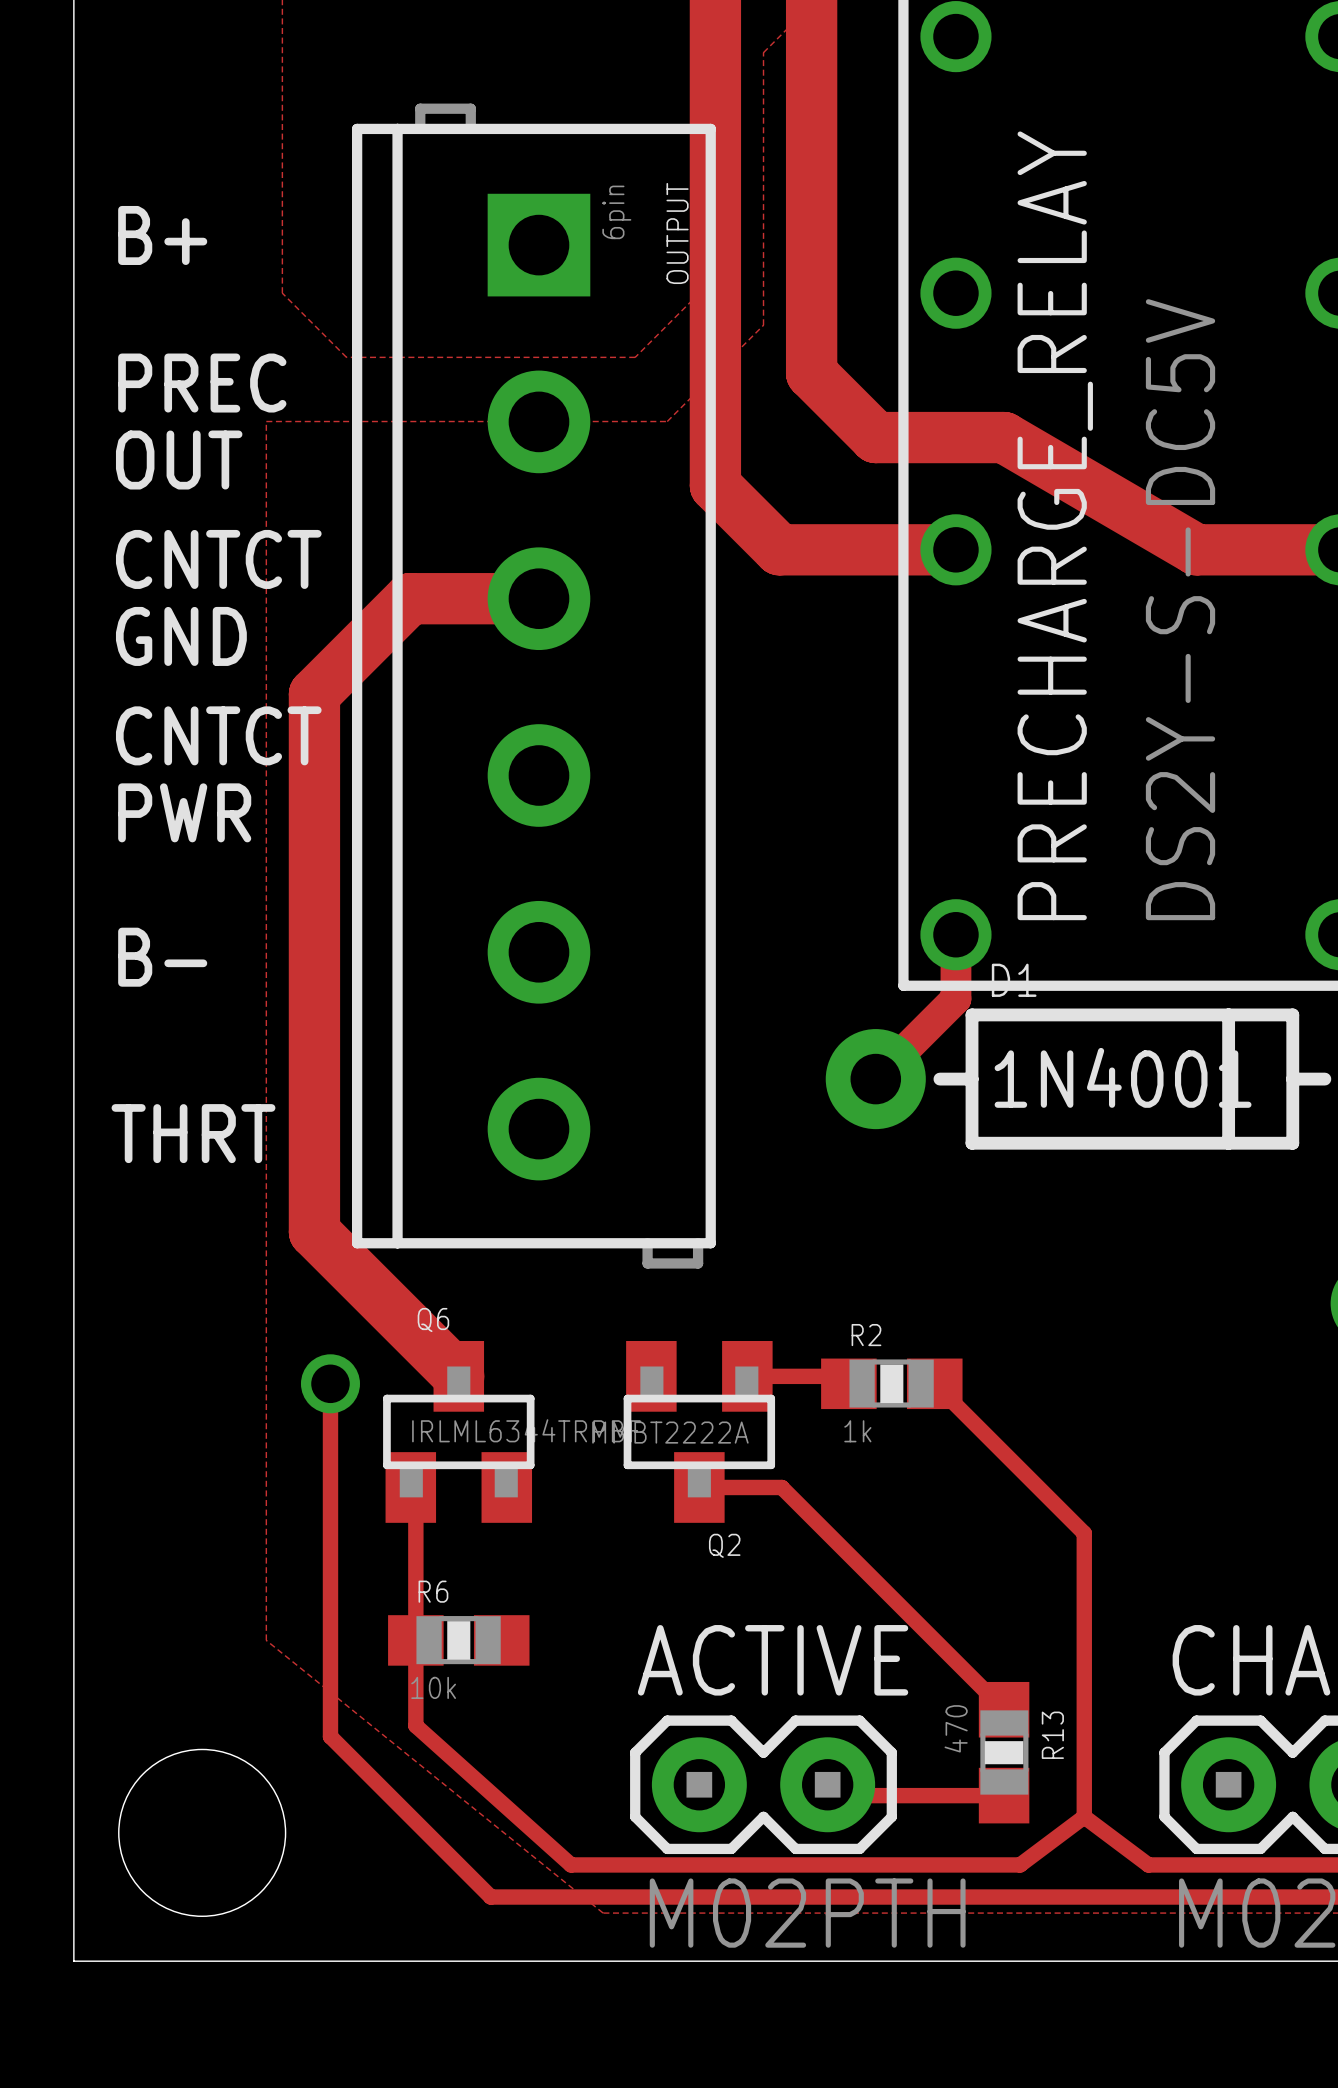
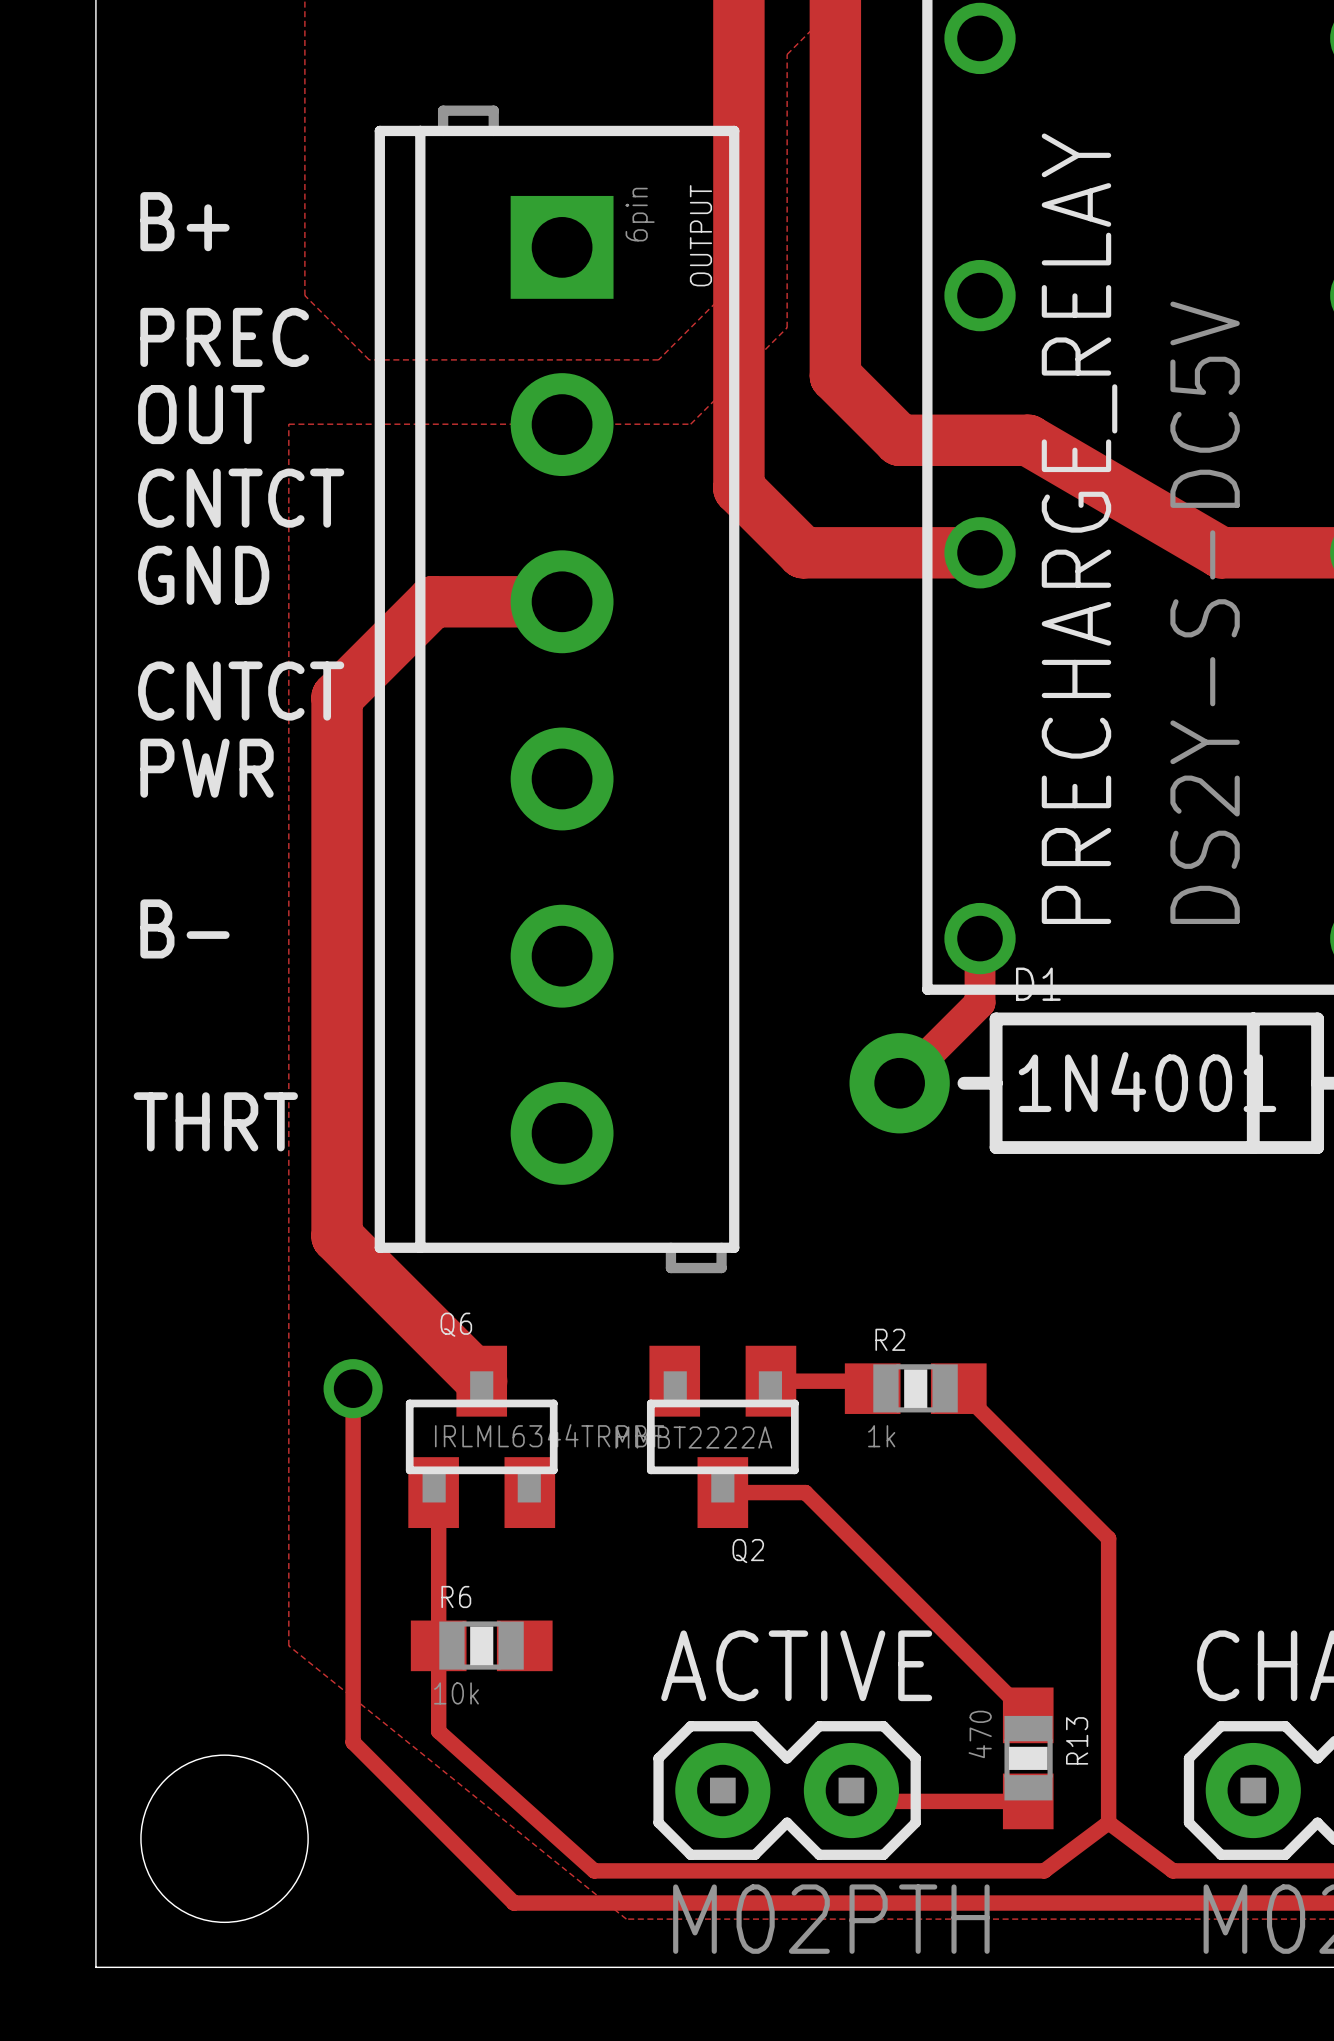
text position: B+ (162, 235) -> B+ (184, 221)
text position: PREC (202, 383) -> PREC (224, 337)
text position: OUT (179, 460) -> OUT (201, 414)
text position: CNTCT (218, 559) -> CNTCT (241, 498)
text position: GND (181, 636) -> GND (203, 575)
text position: CNTCT (218, 735) -> CNTCT (241, 691)
text position: PWR (184, 812) -> PWR (207, 768)
text position: B- (162, 957) -> B- (184, 928)
text position: THRT (193, 1133) -> THRT (215, 1121)

